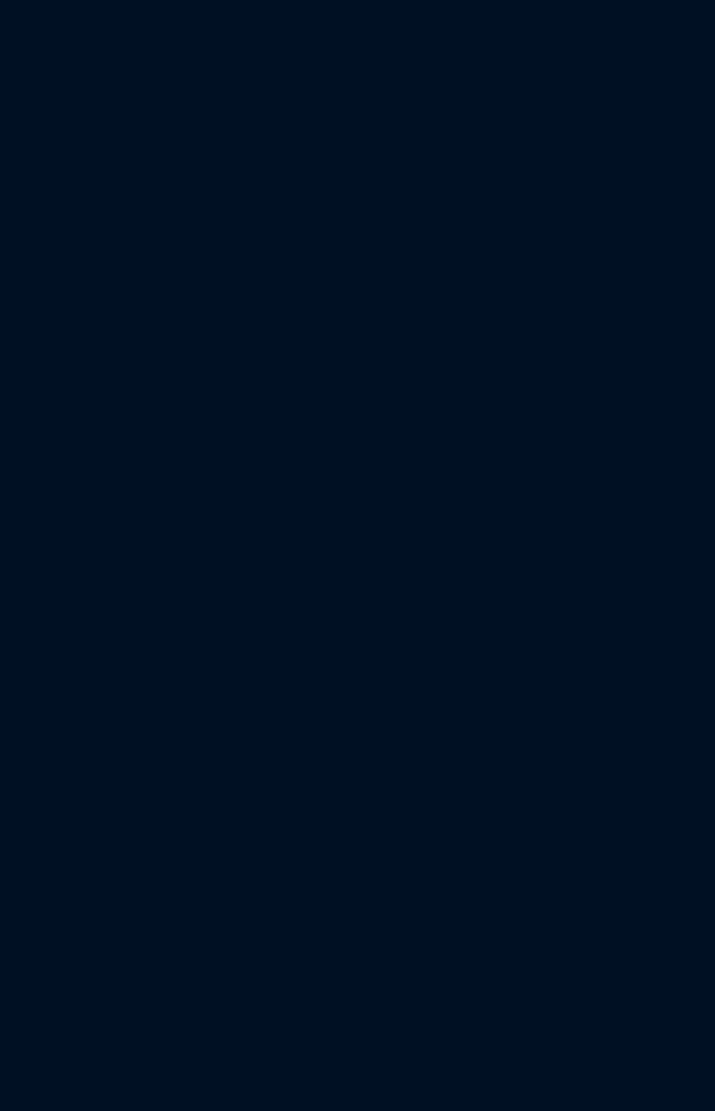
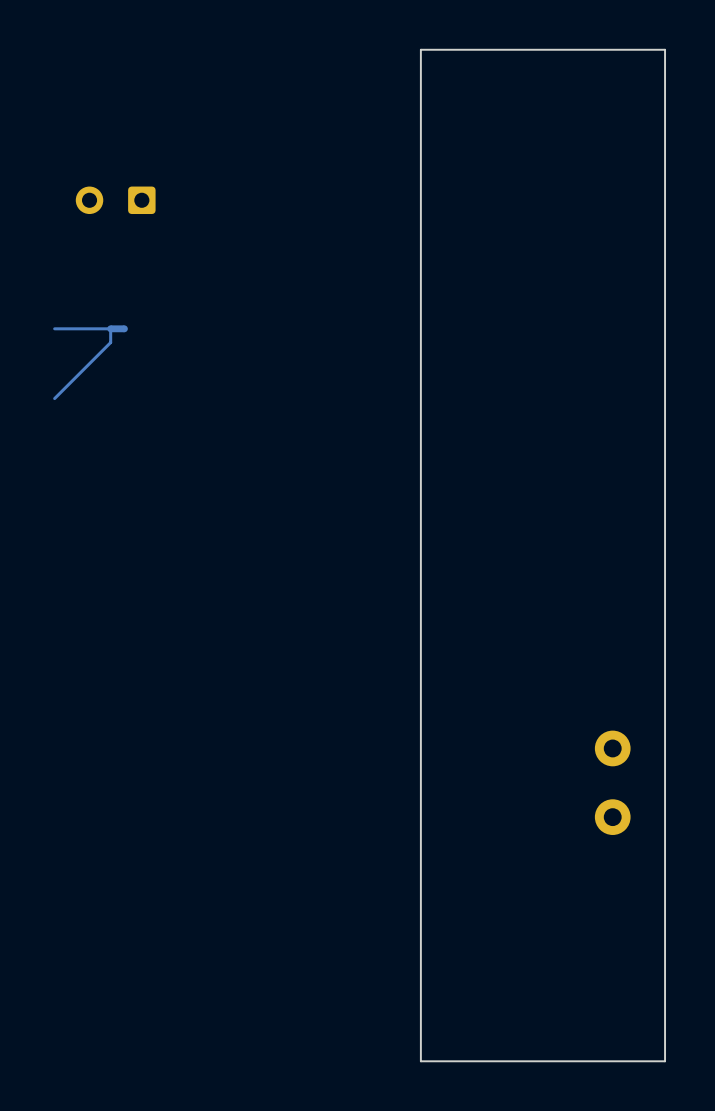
board edge: none -> (665, 49) (420, 49) (420, 1061) (665, 1061) (665, 49)
part: none -> (115, 200)
track: none -> (54, 328) (110, 328) (110, 342) (54, 398)
part: none -> (117, 328)
part: none -> (612, 782)

